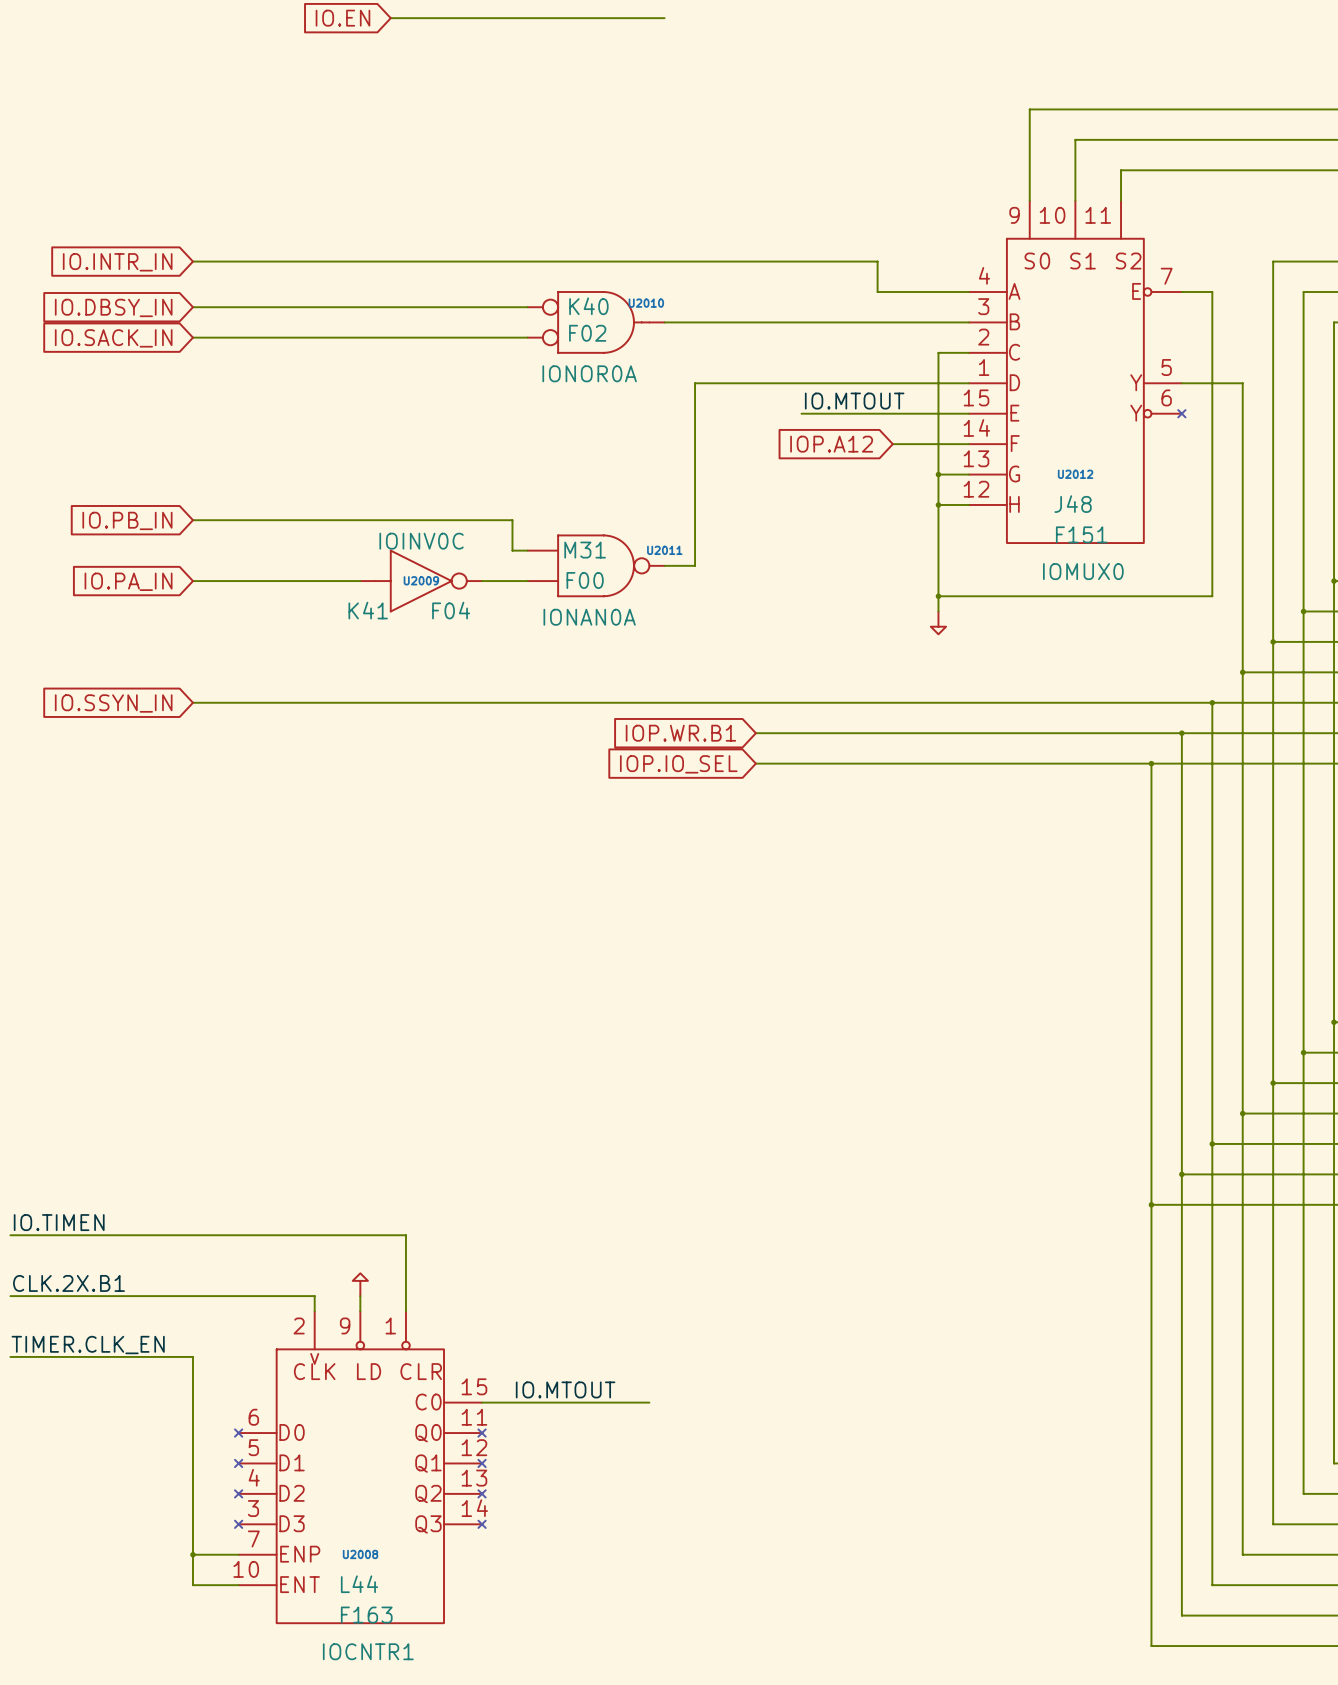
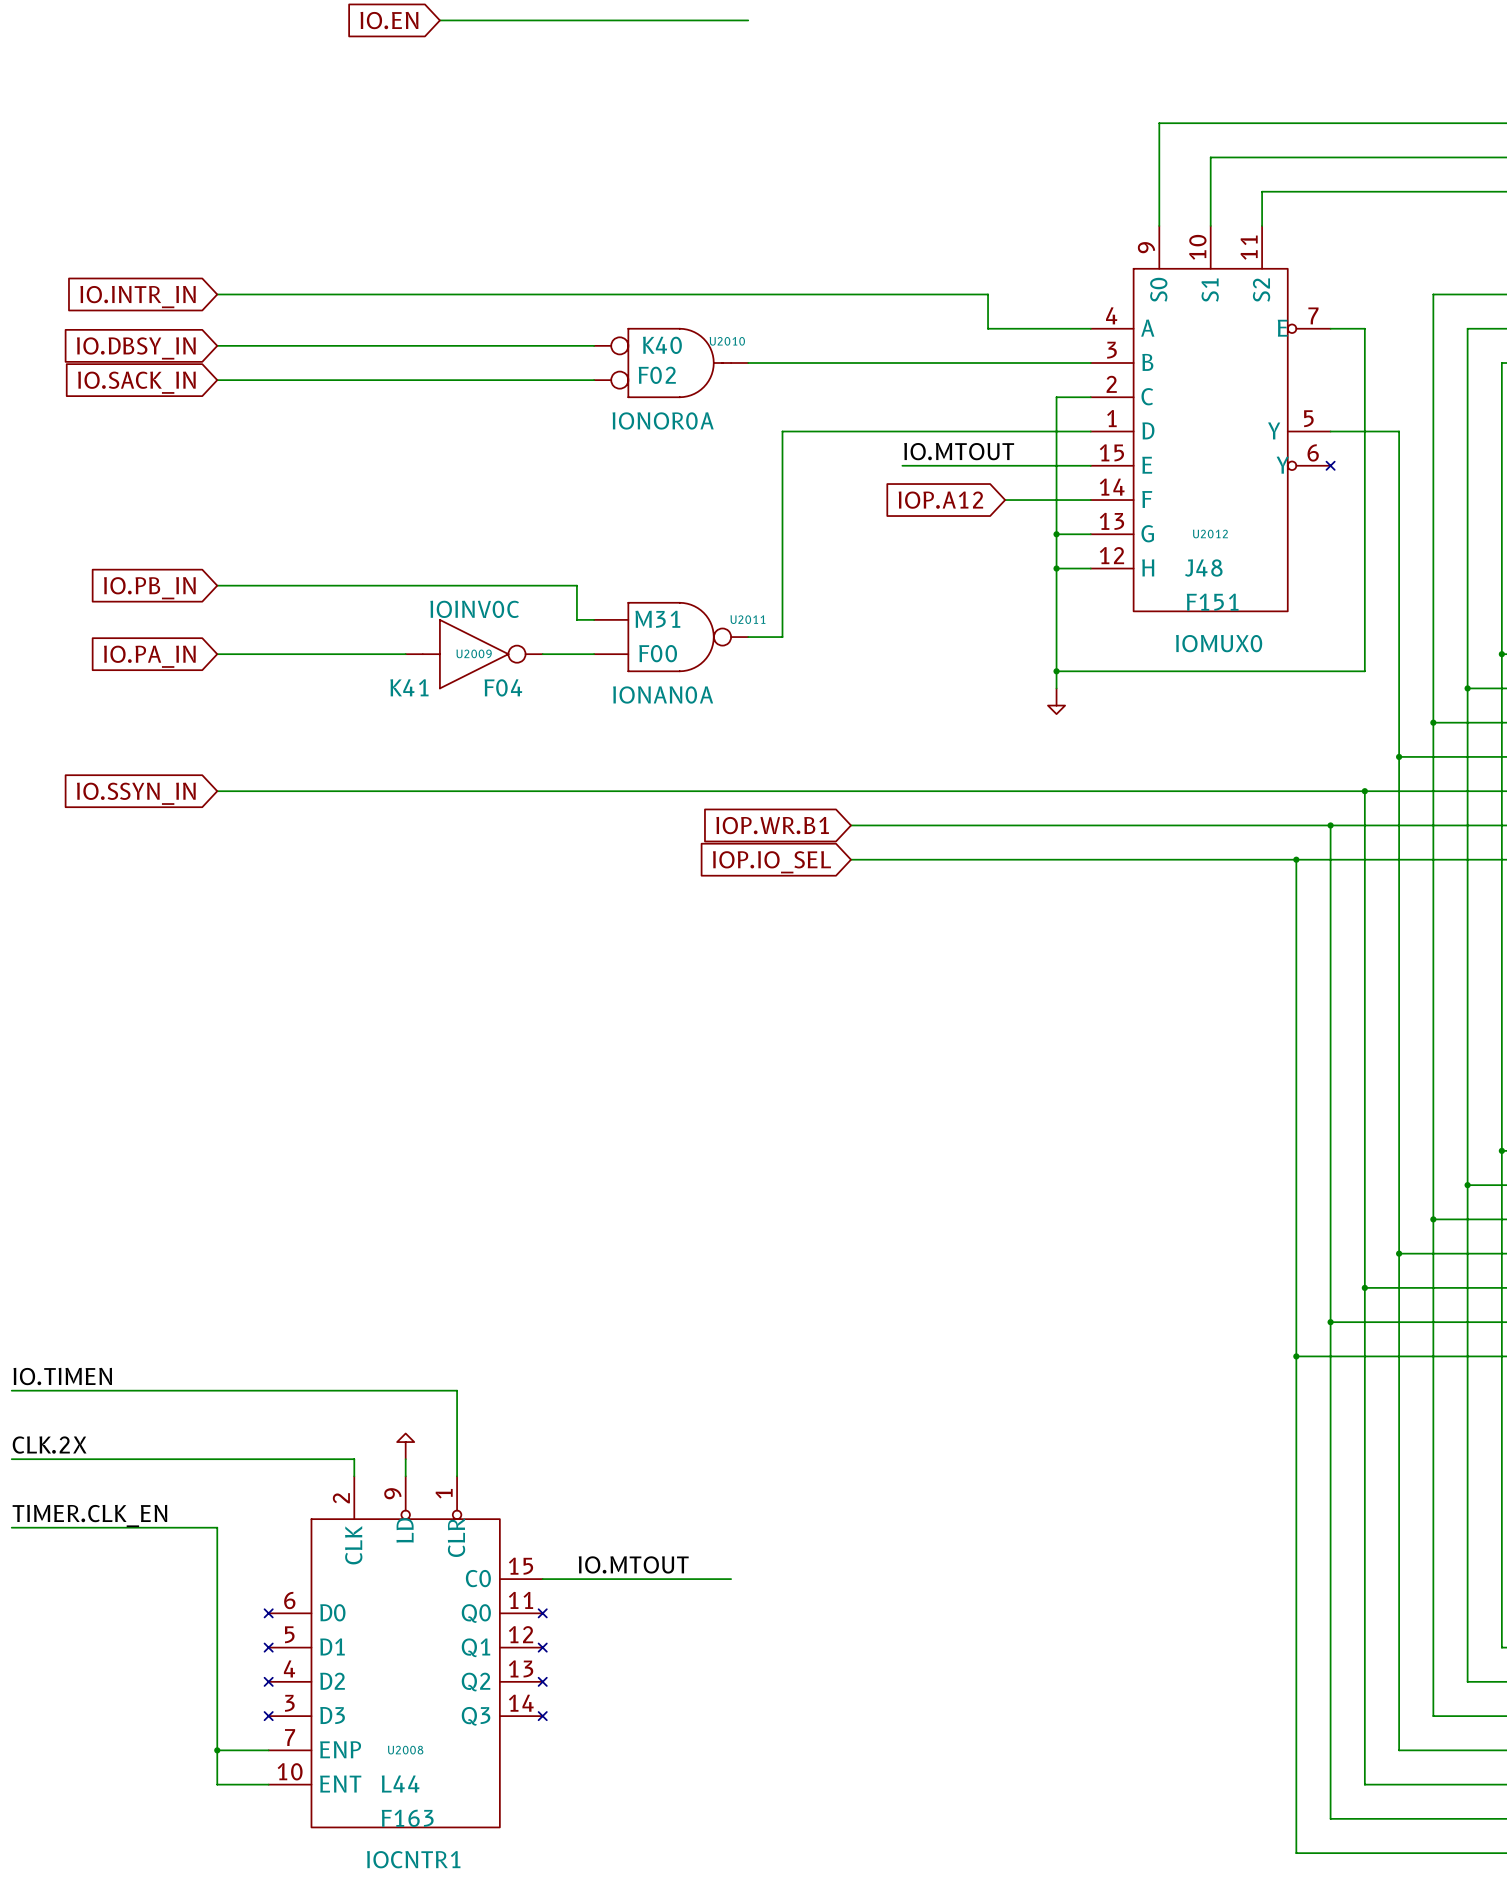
U2012 symbol: [968, 200, 1182, 544] -> [1090, 225, 1331, 612]
label: CLK.2X.B1 (68, 1283) -> CLK.2X (49, 1445)
U2008 symbol: [238, 1311, 483, 1624] -> [268, 1476, 543, 1828]

